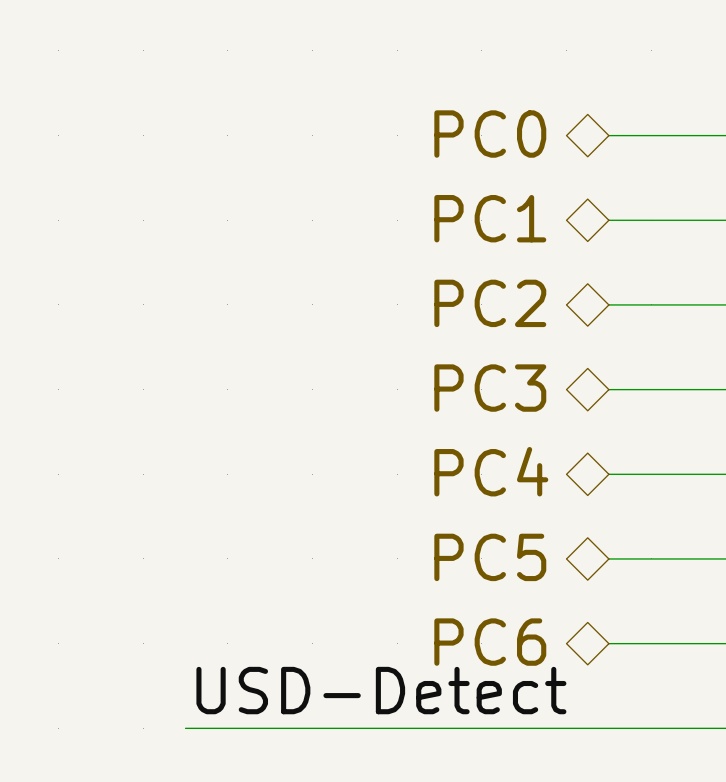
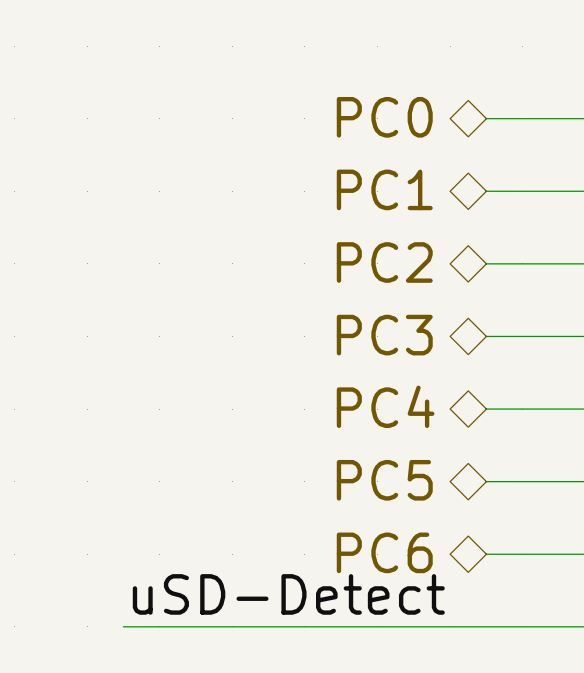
label: USD-Detect (381, 690) -> uSD-Detect (288, 594)

